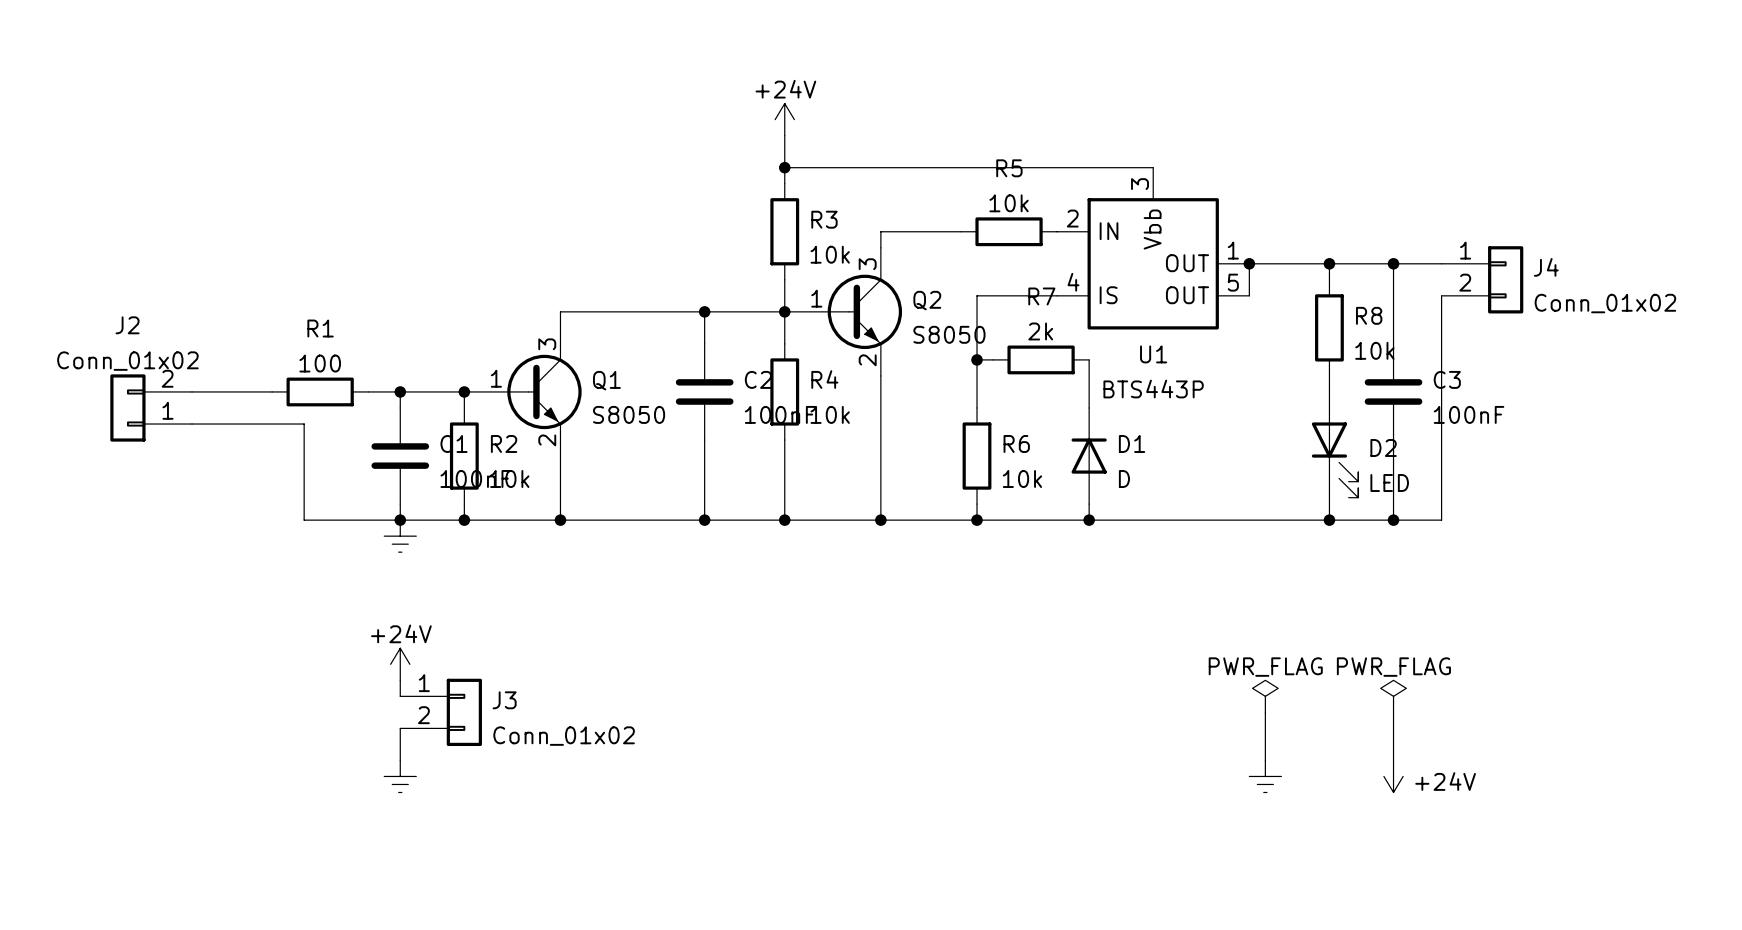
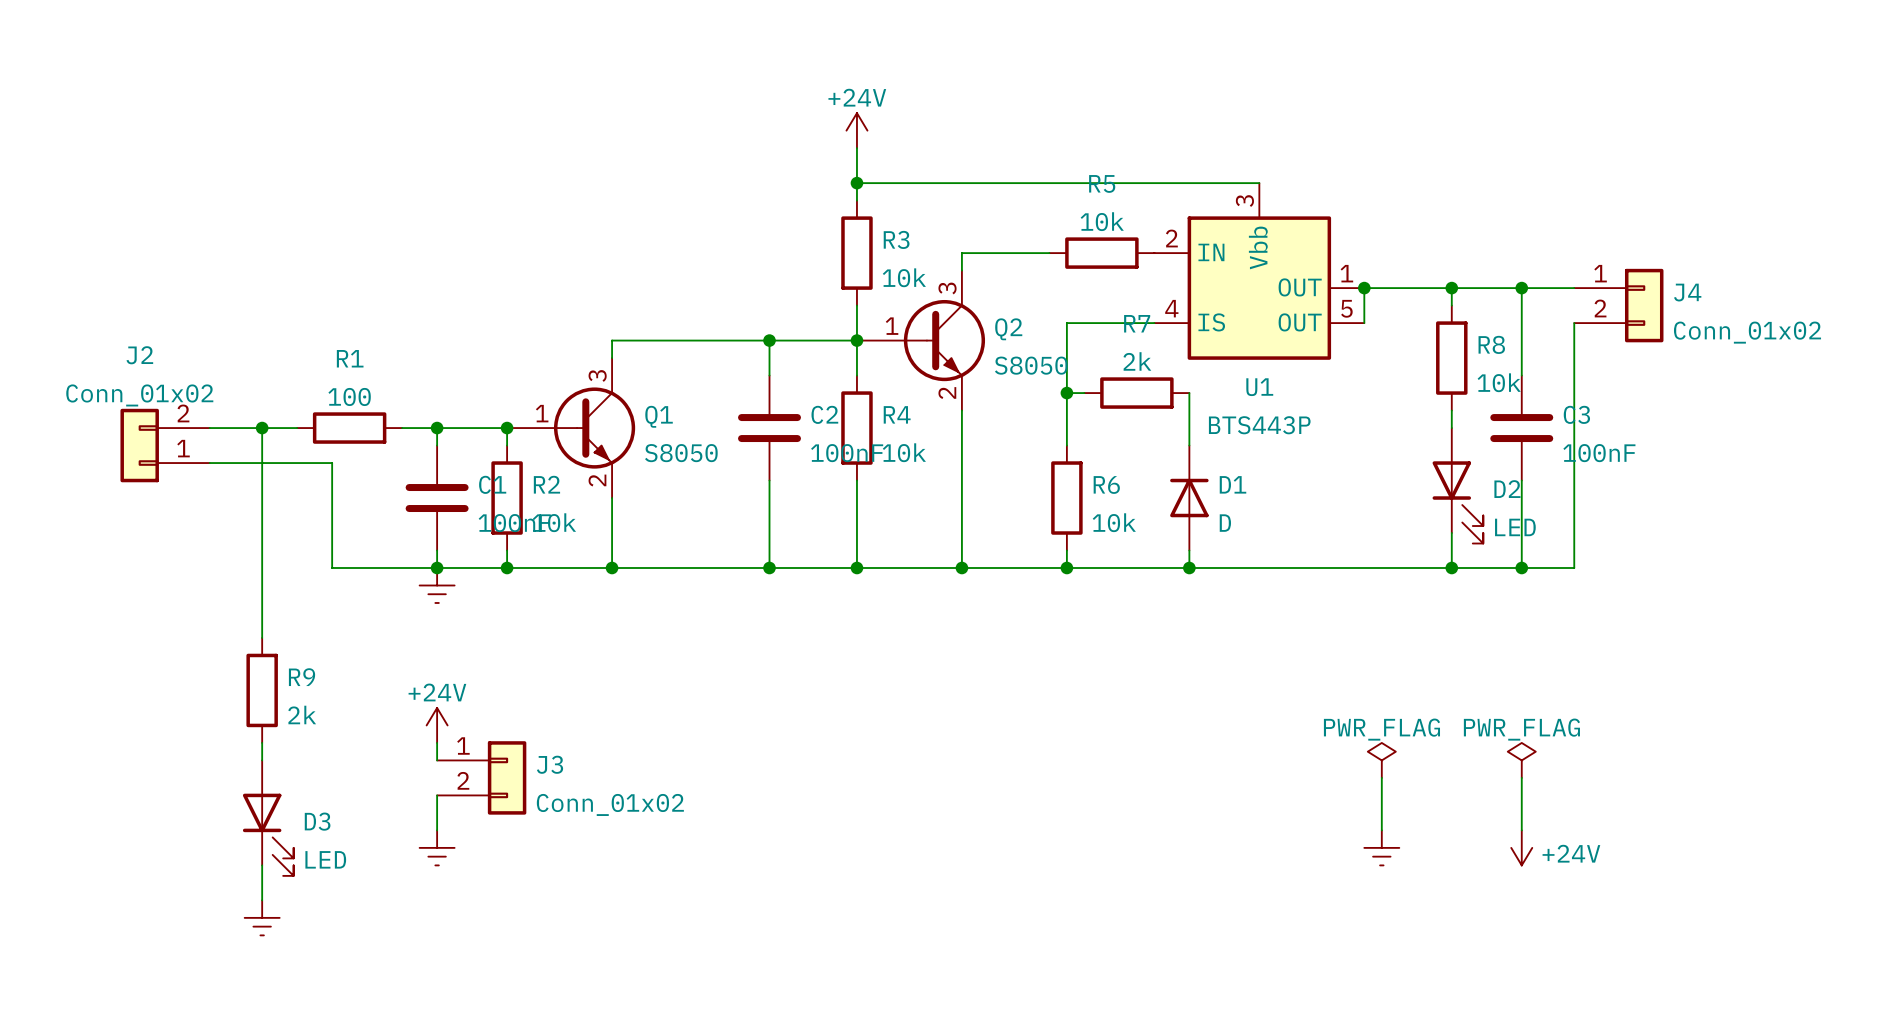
wire: none -> (262, 428) (262, 637)
junction: none -> (262, 428)
R9: none -> 2k (262, 690)
wire: none -> (262, 742) (262, 760)
D3: none -> LED (268, 818)
wire: none -> (262, 865) (262, 900)
power symbol: none -> (262, 917)

